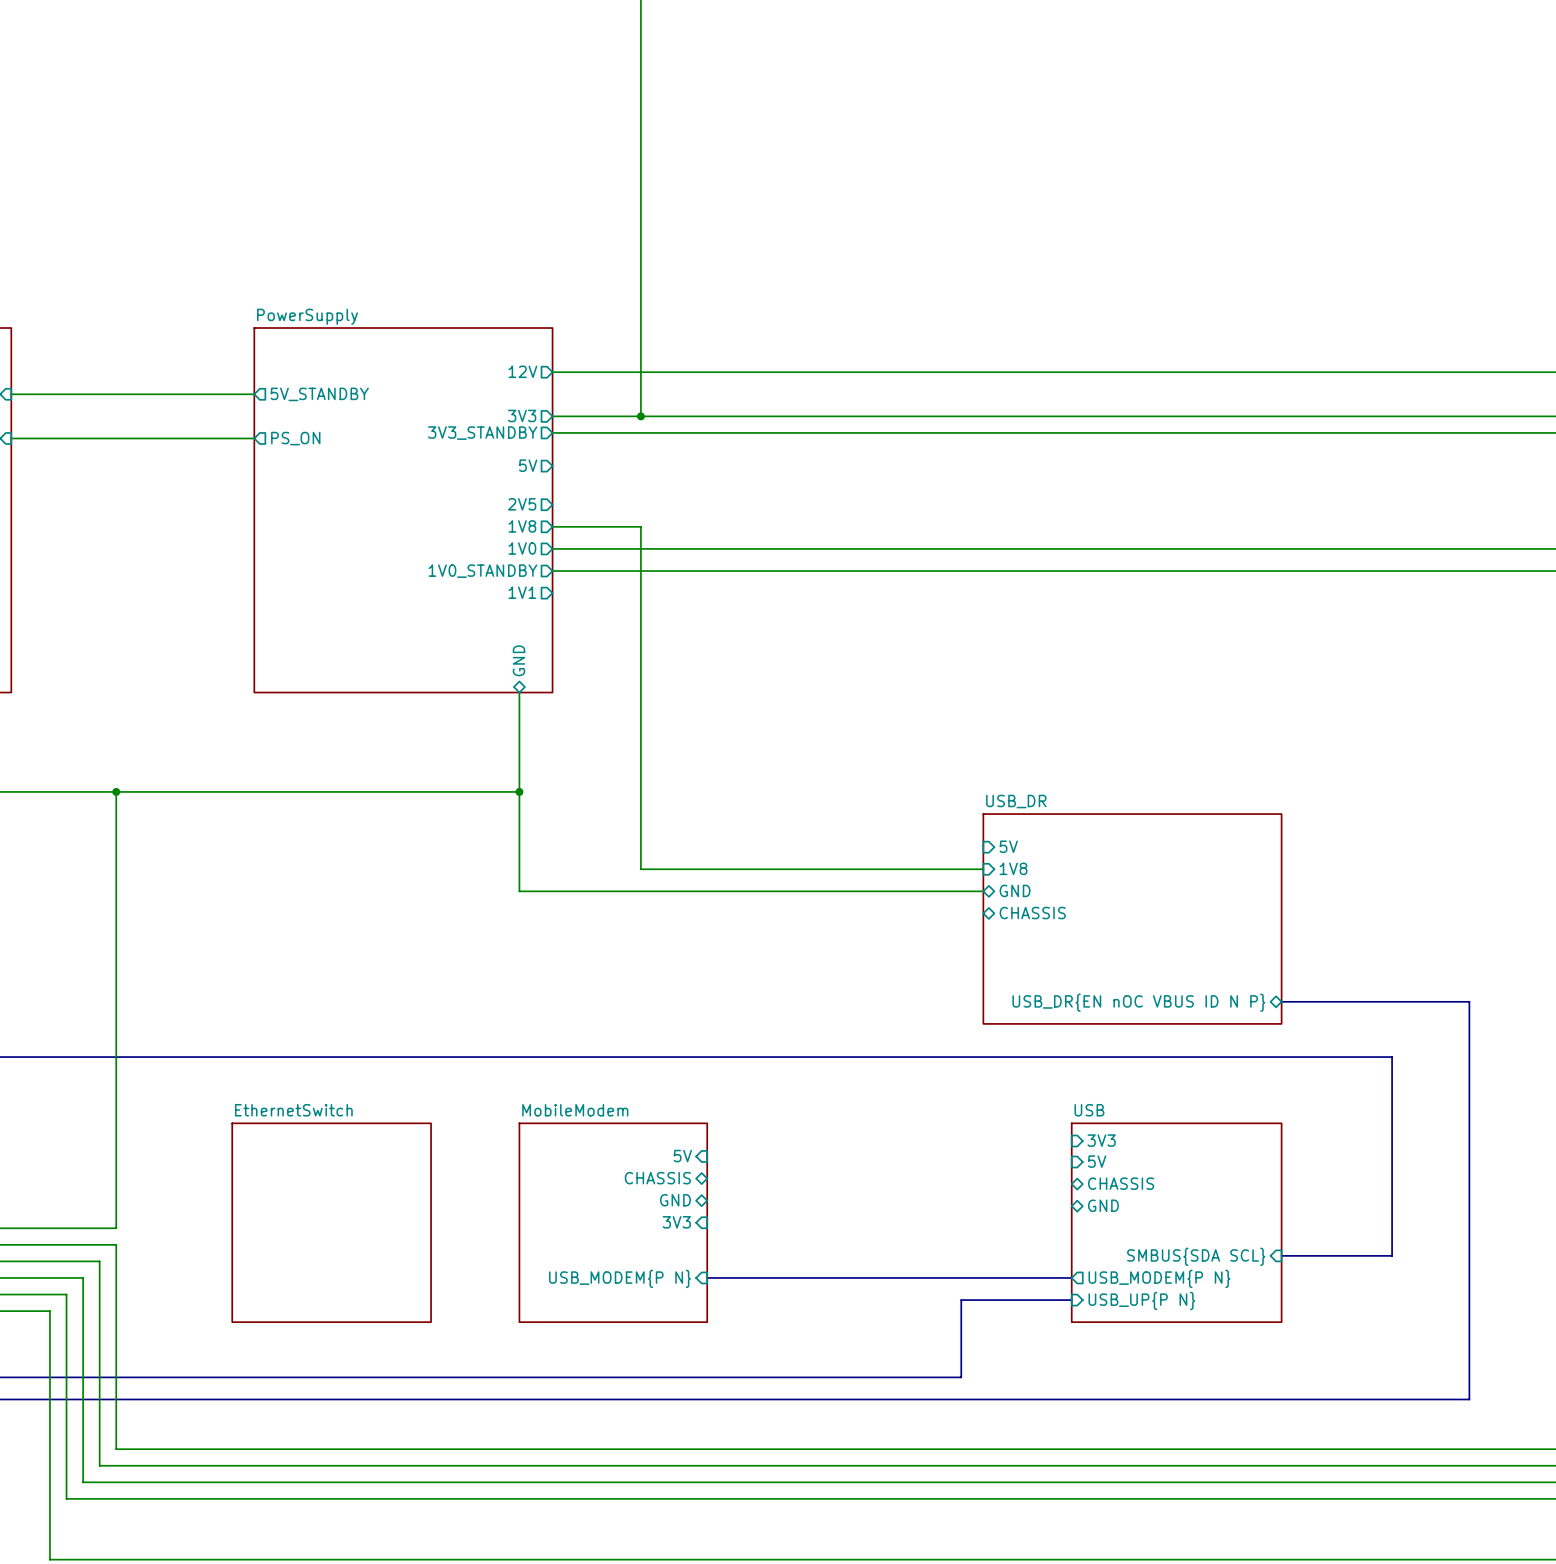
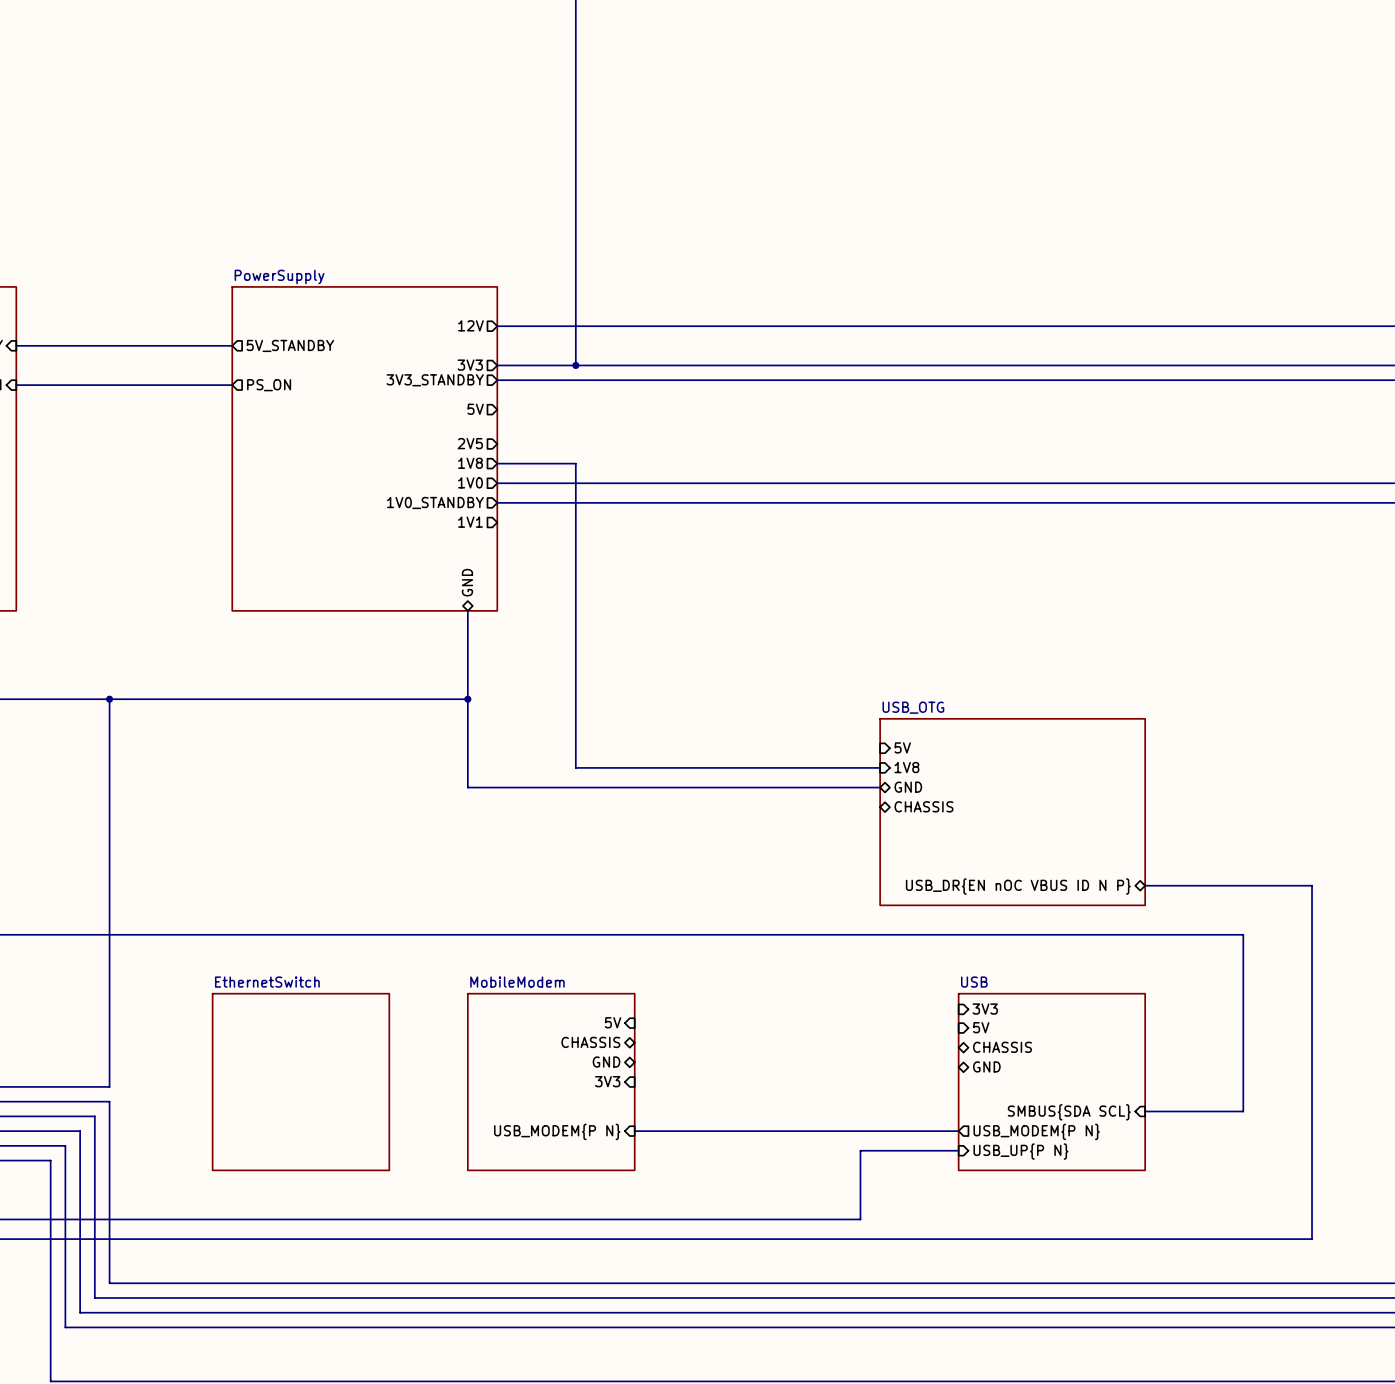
sheet USB_DR name: USB_DR (1016, 801) -> USB_OTG (913, 707)

